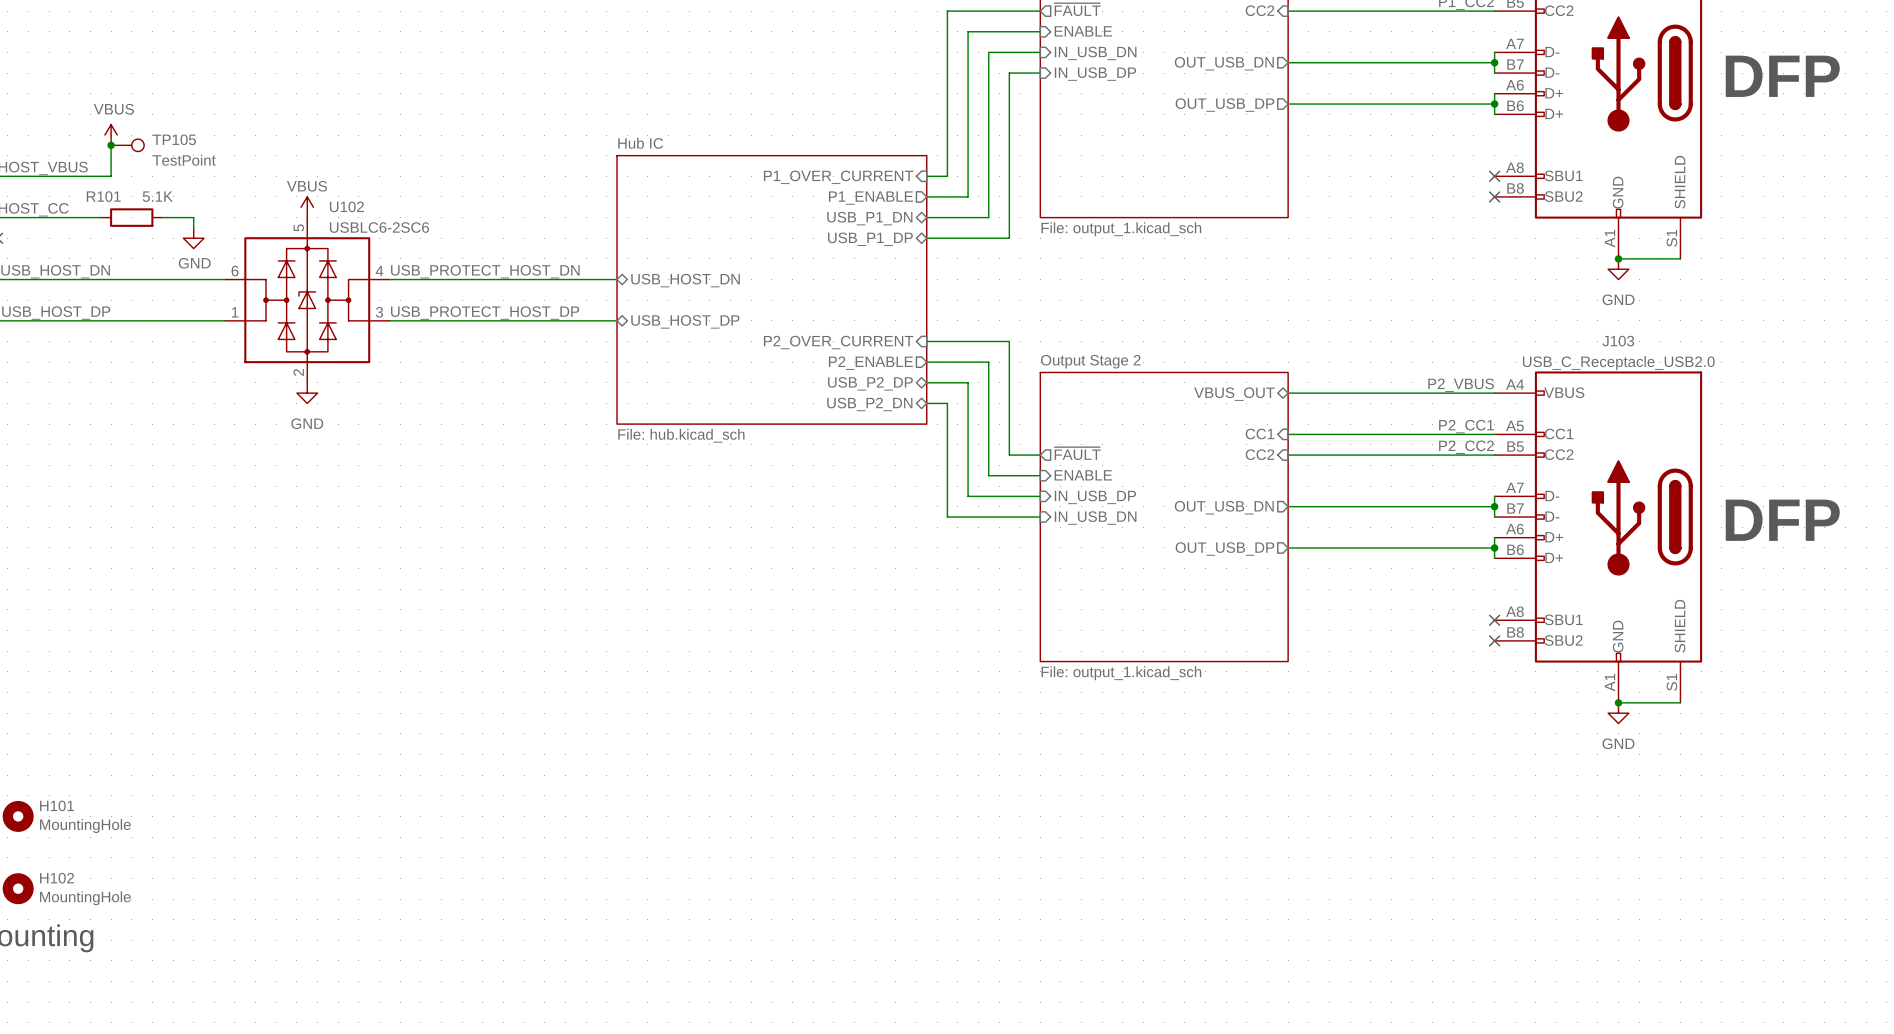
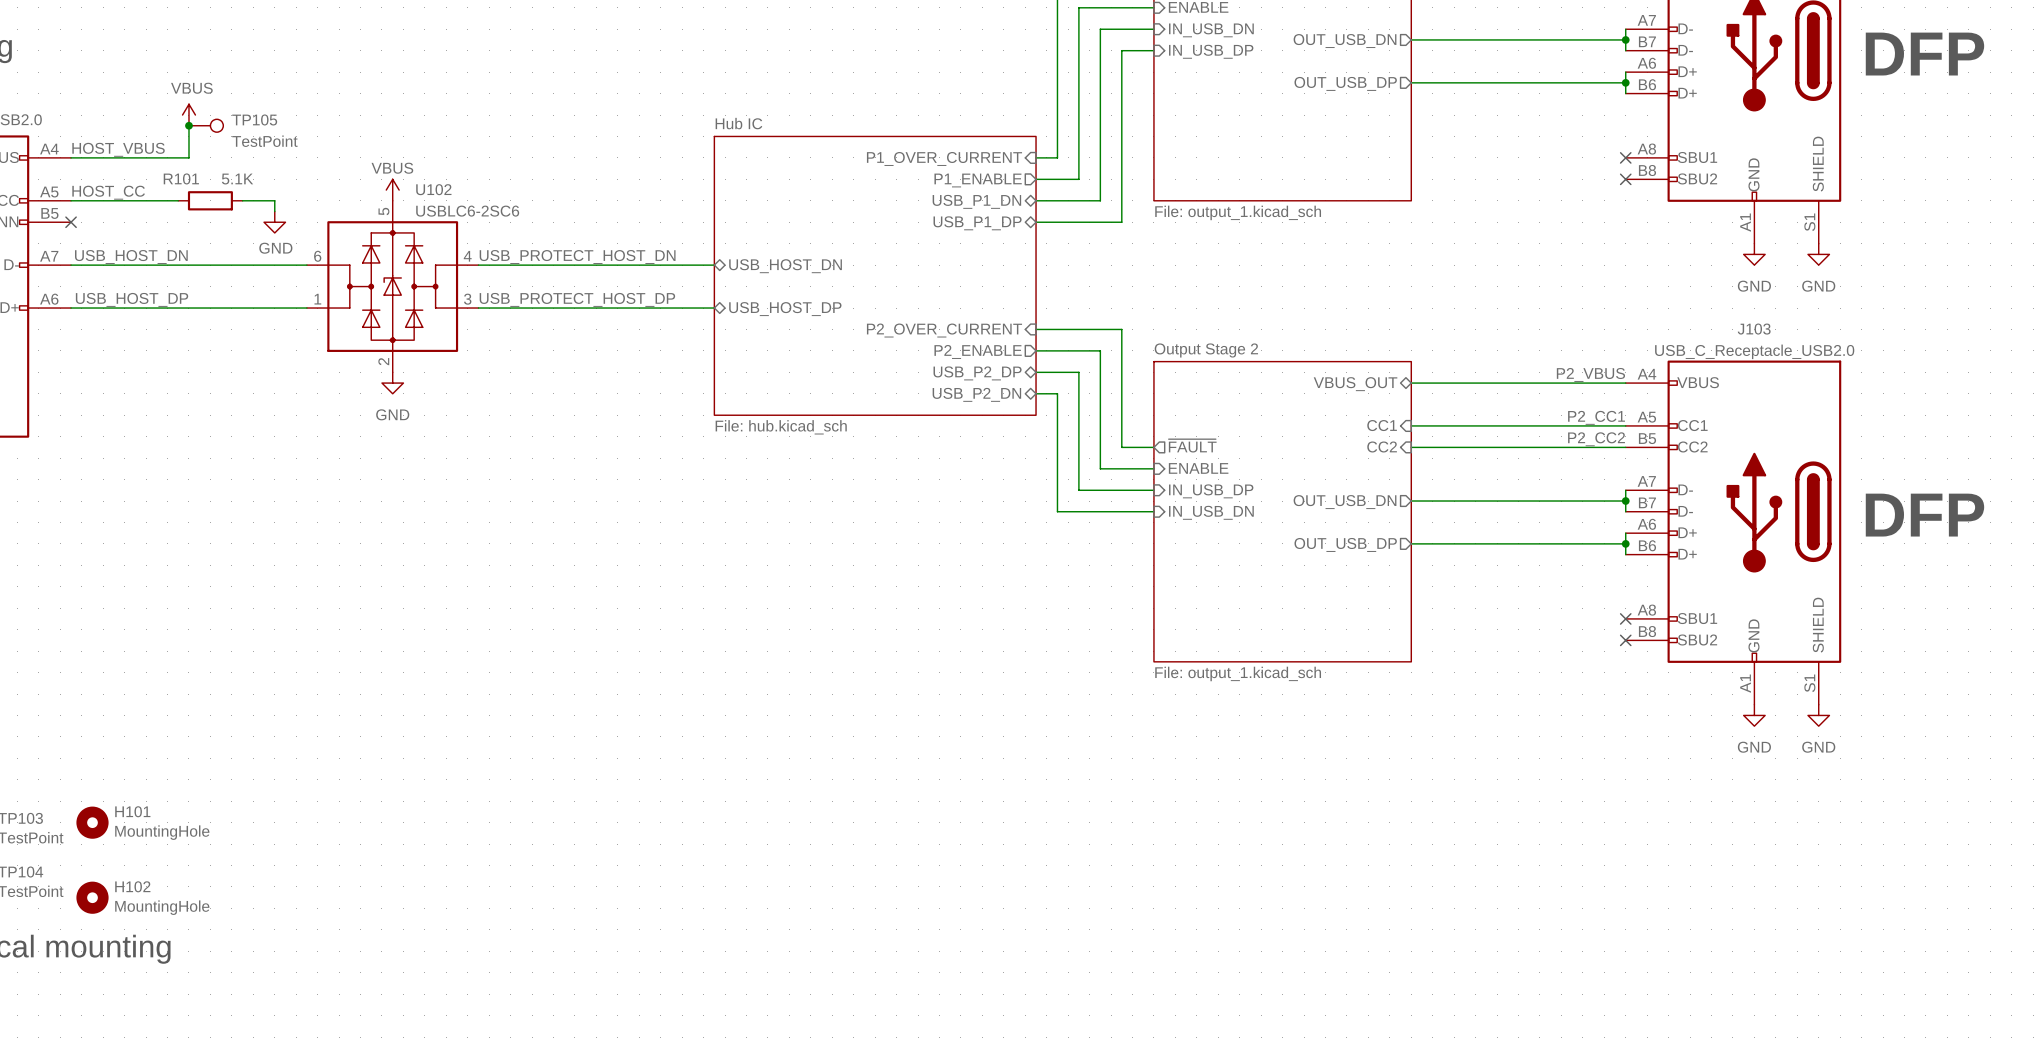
wire: (1618, 258) (1680, 258) -> none
junction: (1618, 258) -> none
power symbol: none -> GND (1818, 254)
wire: (1618, 702) (1680, 702) -> none
junction: (1618, 702) -> none
power symbol: none -> GND (1818, 715)

